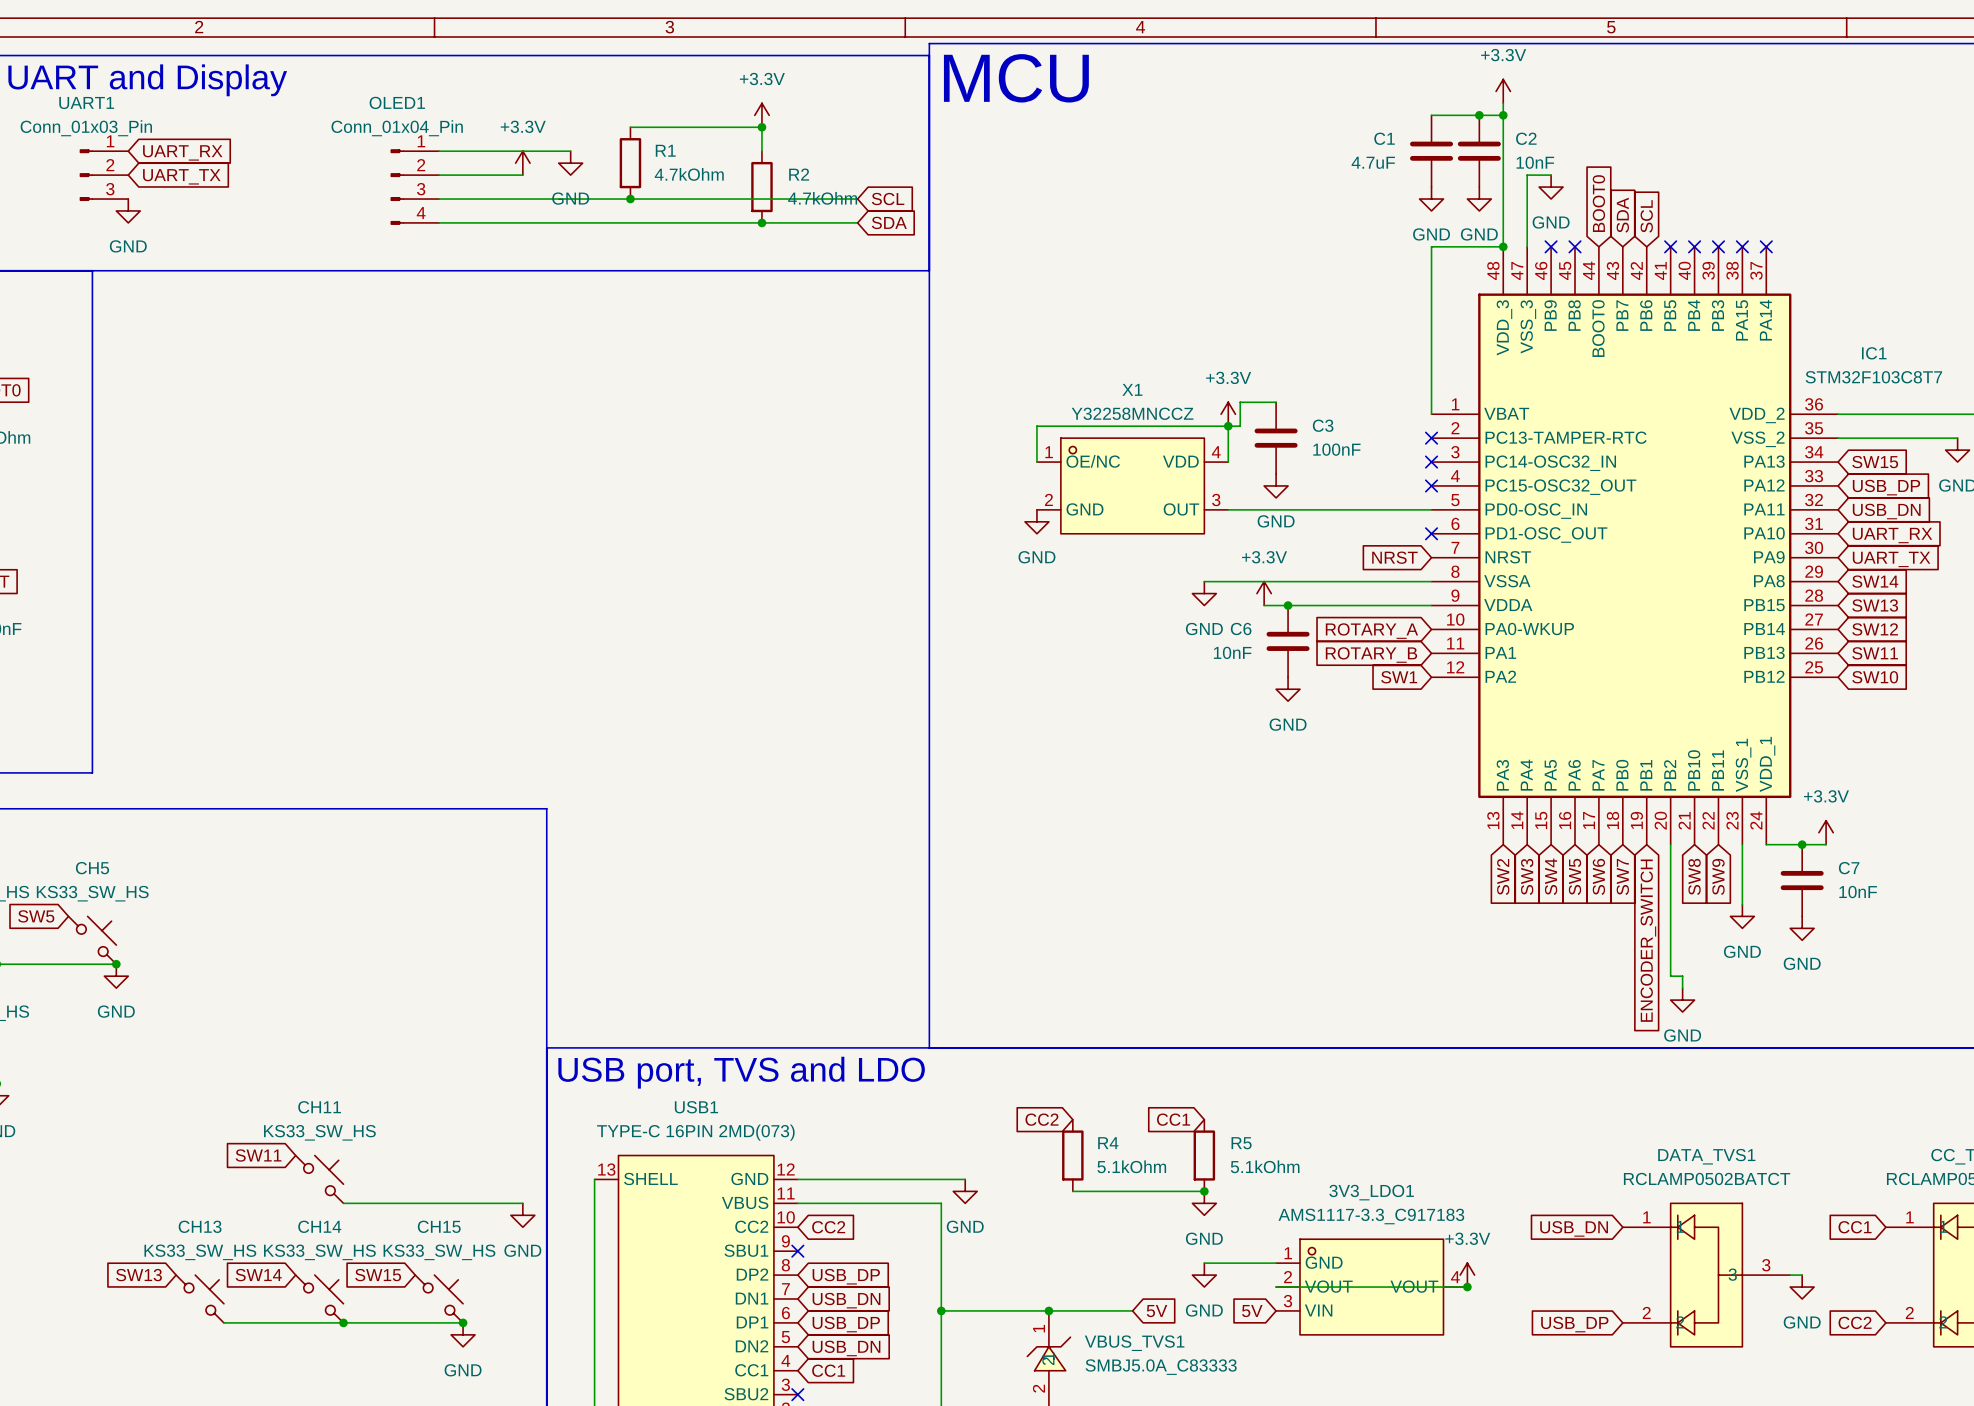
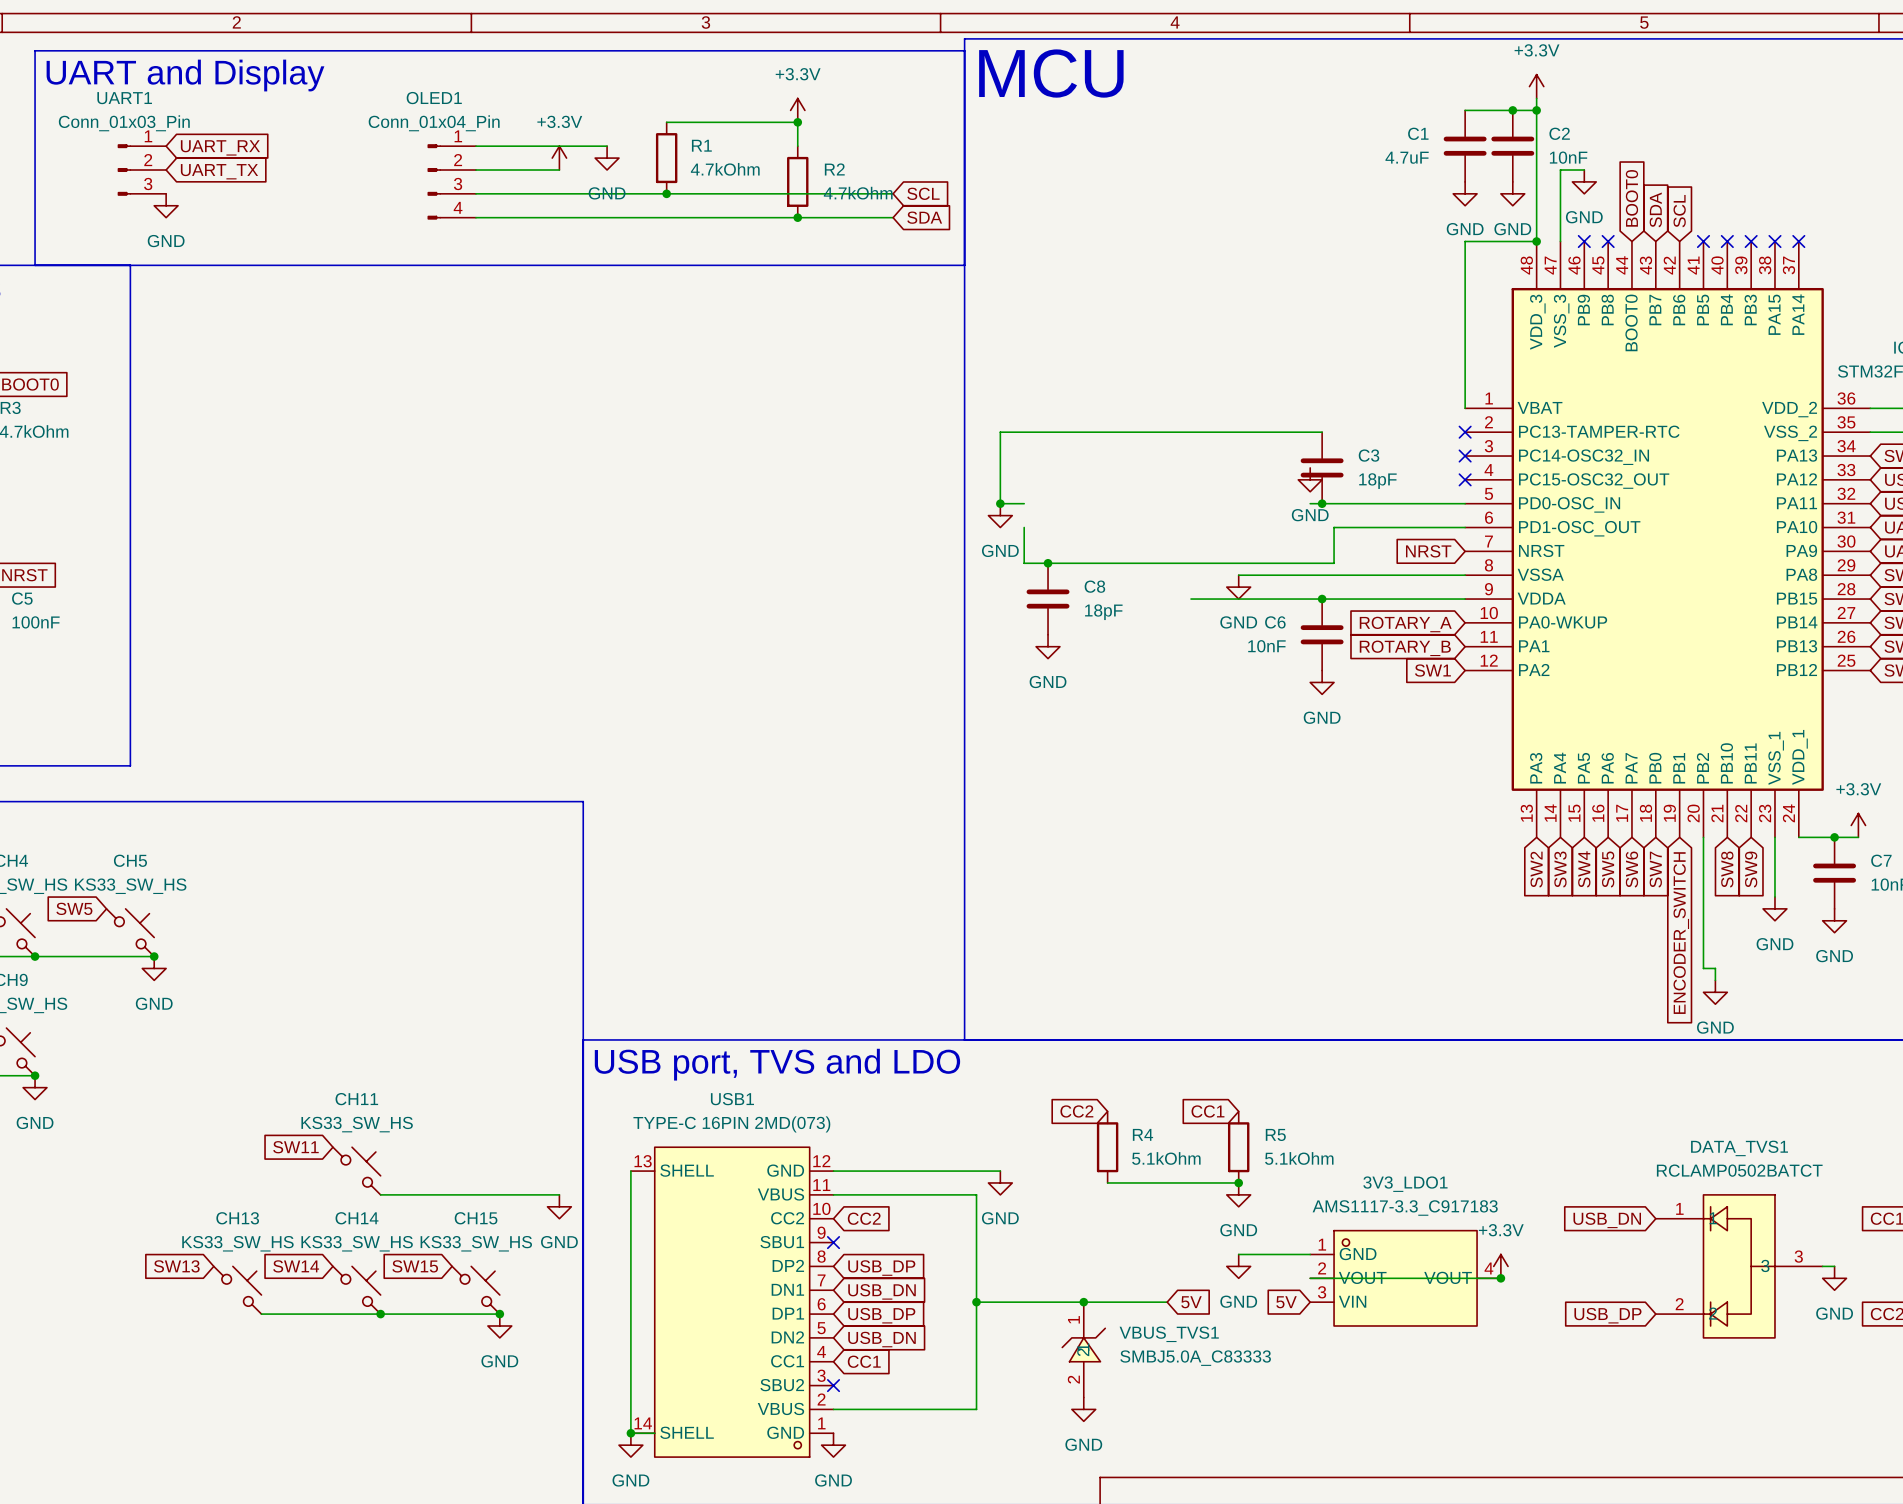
wire: (1276, 402) (1240, 402) (1240, 426) (1036, 426) (1036, 462) -> none
power symbol: +3.3V (1228, 414) -> none
wire: (1228, 426) (1228, 462) -> none
junction: (1228, 426) -> none
C3 position: (1276, 438) -> (1322, 467)
wire: none -> (1322, 432) (1000, 432) (1000, 503) (1024, 503)
C3 value: 100nF (1336, 449) -> 18pF (1377, 481)
X1: Y32258MNCCZ (1132, 485) -> none
junction: none -> (1000, 503)
wire: (1228, 509) (1276, 509) -> none
junction: none -> (1322, 503)
power symbol: none -> GND (1000, 515)
power symbol: GND (1036, 521) -> none
wire: none -> (1024, 527) (1024, 563) (1334, 563) (1334, 527) (1465, 527)
no-connect mark: (1431, 533) -> none
junction: none -> (1048, 563)
power symbol: +3.3V (1264, 593) -> none
C8: none -> 18pF (1048, 599)
wire: none -> (1191, 599) (1298, 599)
power symbol: none -> GND (1048, 646)

